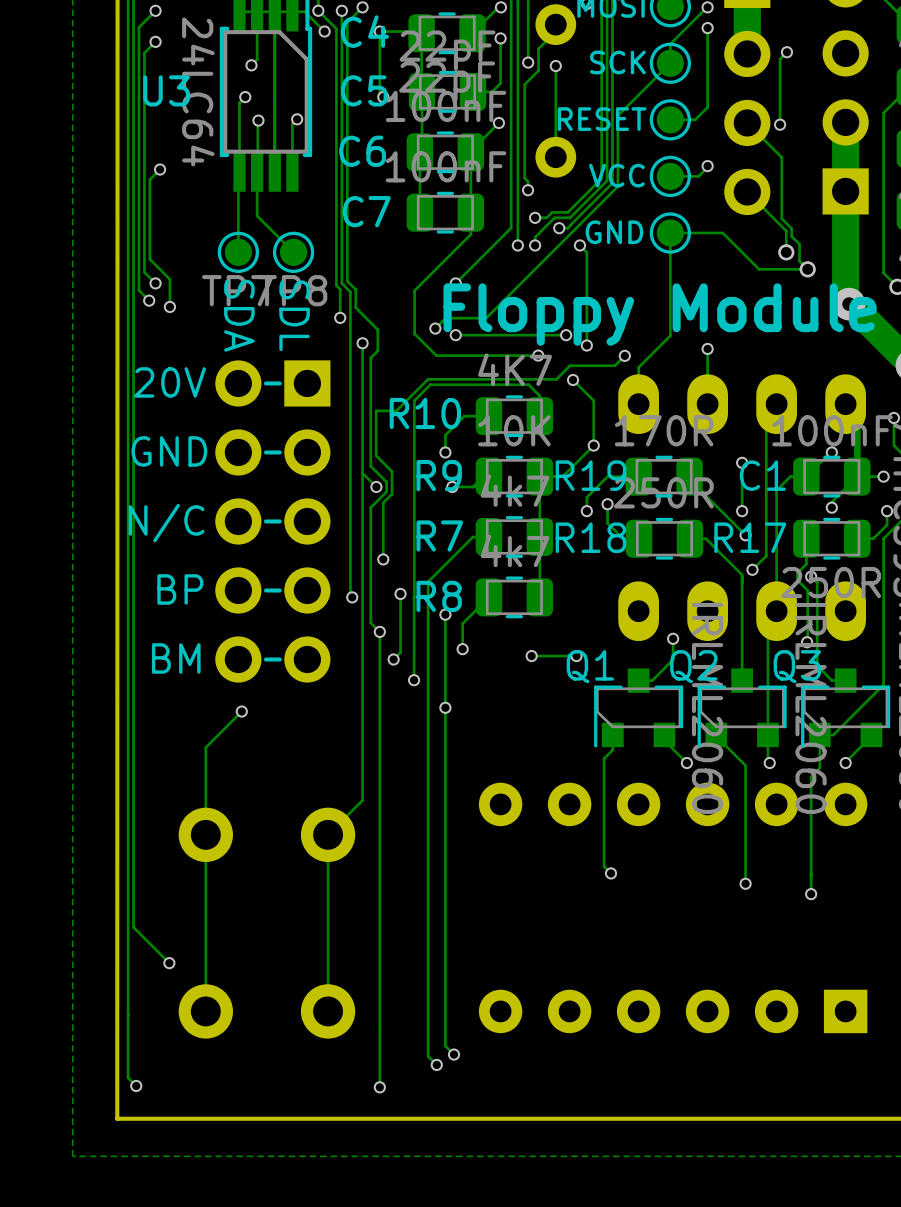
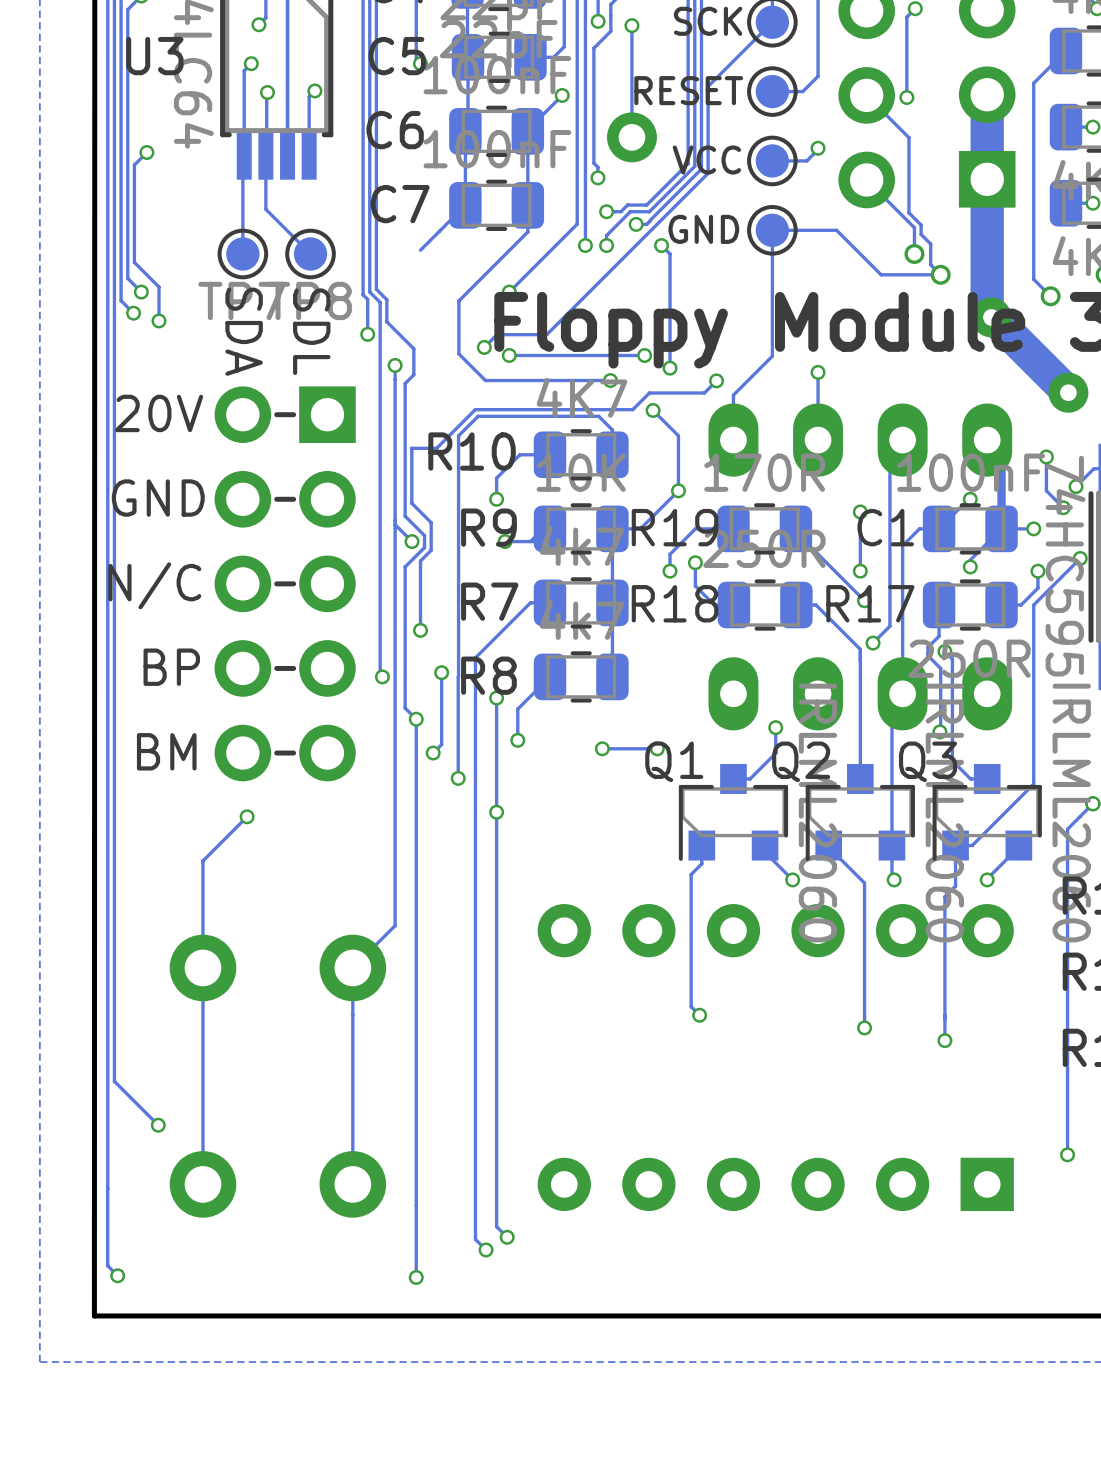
track: none -> (465, 205) (420, 250)

